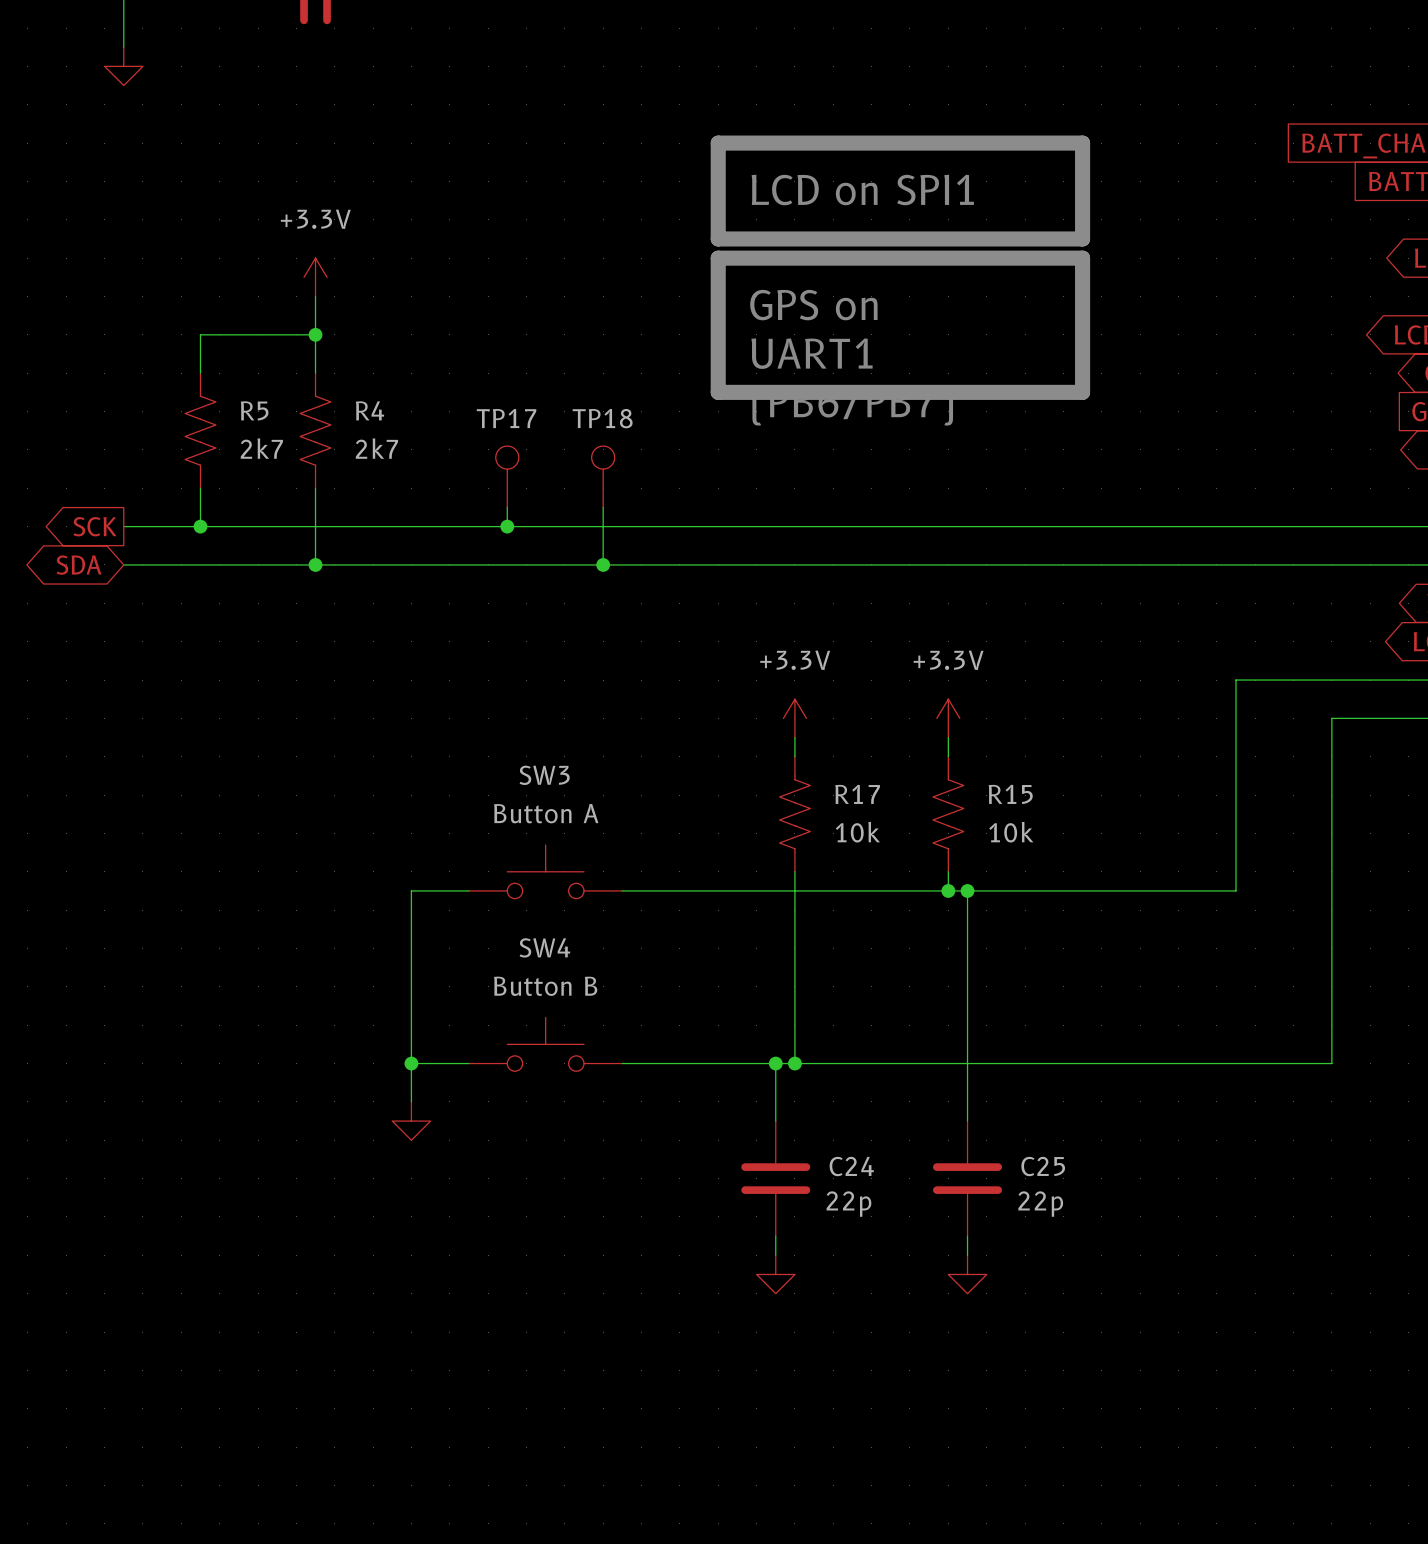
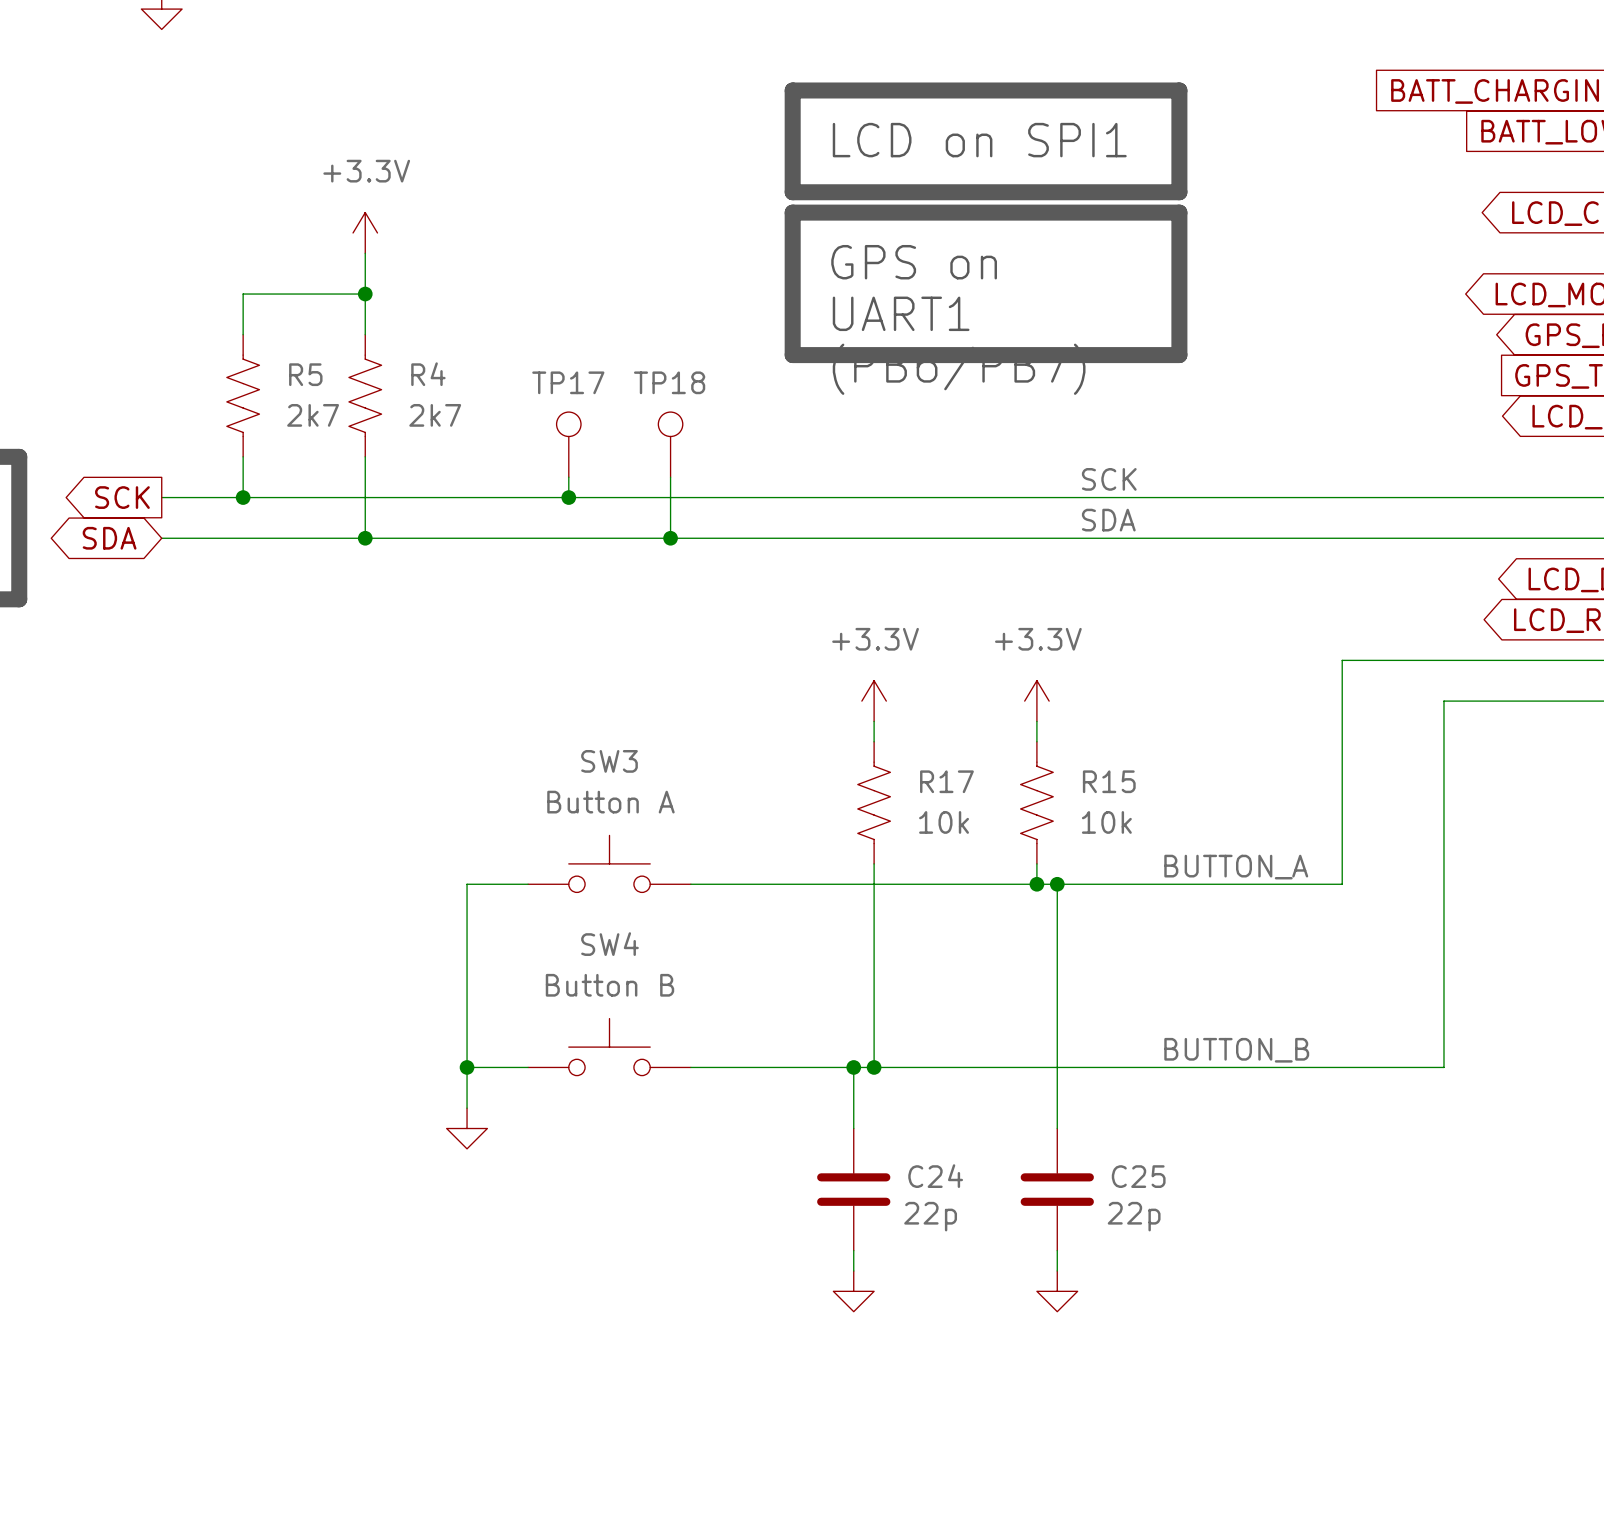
label: none -> SCK (1109, 479)
label: none -> SDA (1108, 520)
label: none -> BUTTON_A (1236, 867)
label: none -> BUTTON_B (1236, 1050)

